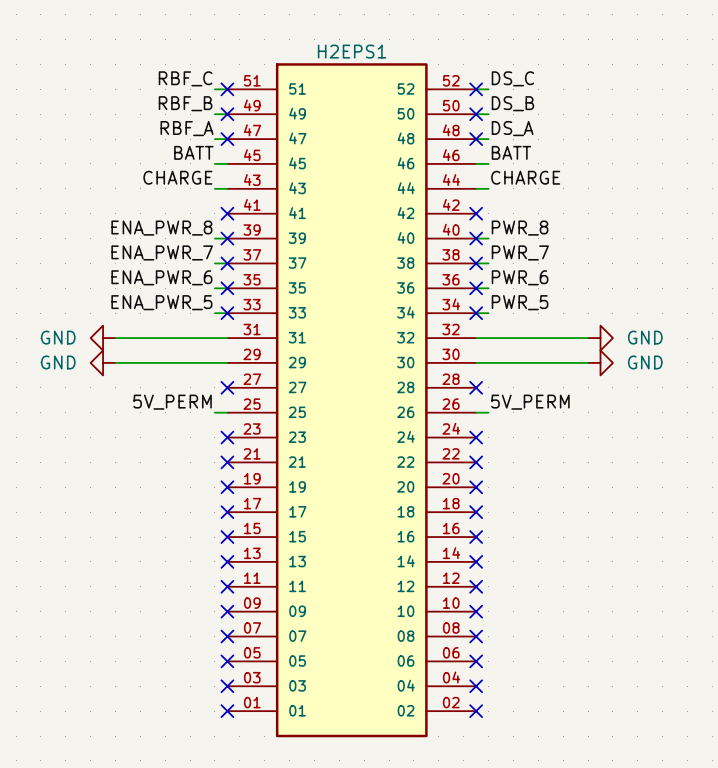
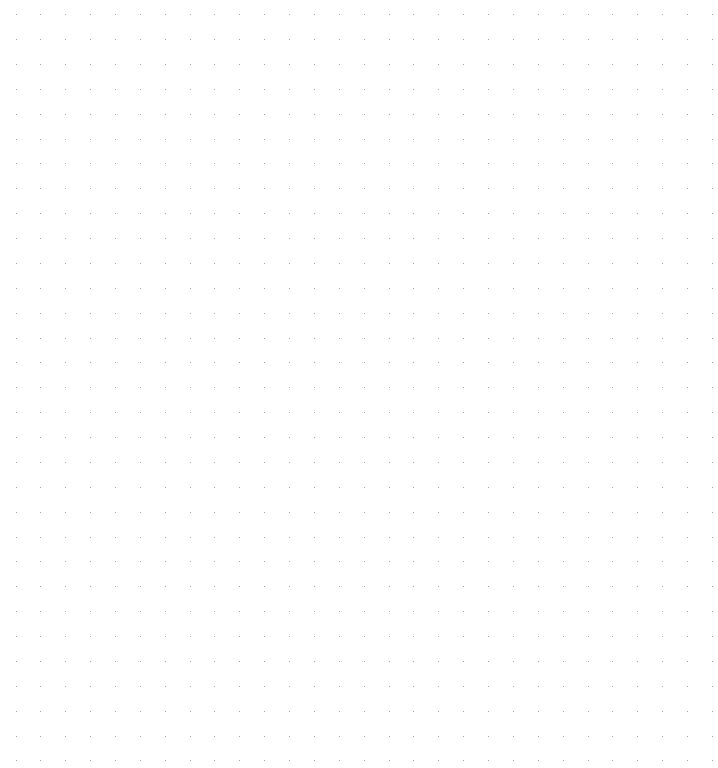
label: RBF_C (185, 78) -> none
label: DS_C (512, 78) -> none
wire: (214, 89) (227, 89) -> none
no-connect mark: (227, 89) -> none
wire: (476, 89) (488, 89) -> none
no-connect mark: (476, 89) -> none
label: RBF_B (185, 103) -> none
label: DS_B (512, 103) -> none
wire: (214, 114) (227, 114) -> none
no-connect mark: (227, 114) -> none
wire: (476, 114) (488, 114) -> none
no-connect mark: (476, 114) -> none
label: RBF_A (187, 128) -> none
label: DS_A (512, 128) -> none
wire: (214, 139) (227, 139) -> none
no-connect mark: (227, 139) -> none
wire: (476, 139) (488, 139) -> none
no-connect mark: (476, 139) -> none
label: BATT (193, 152) -> none
label: BATT (511, 152) -> none
wire: (214, 163) (227, 163) -> none
wire: (476, 163) (488, 163) -> none
label: CHARGE (177, 177) -> none
label: CHARGE (525, 177) -> none
wire: (214, 188) (227, 188) -> none
wire: (476, 188) (488, 188) -> none
no-connect mark: (227, 213) -> none
no-connect mark: (476, 213) -> none
label: ENA_PWR_8 (161, 228) -> none
label: PWR_8 (520, 228) -> none
wire: (214, 238) (227, 238) -> none
no-connect mark: (227, 238) -> none
wire: (476, 238) (488, 238) -> none
no-connect mark: (476, 238) -> none
label: ENA_PWR_7 (162, 252) -> none
label: PWR_7 (520, 252) -> none
wire: (214, 263) (227, 263) -> none
no-connect mark: (227, 263) -> none
wire: (476, 263) (488, 263) -> none
no-connect mark: (476, 263) -> none
label: ENA_PWR_6 (161, 277) -> none
label: PWR_6 (520, 277) -> none
wire: (214, 288) (227, 288) -> none
no-connect mark: (227, 288) -> none
wire: (476, 288) (488, 288) -> none
no-connect mark: (476, 288) -> none
label: ENA_PWR_5 (161, 302) -> none
label: PWR_5 (520, 302) -> none
wire: (214, 313) (227, 313) -> none
no-connect mark: (227, 313) -> none
wire: (476, 313) (488, 313) -> none
no-connect mark: (476, 313) -> none
power symbol: GND (103, 338) -> none
wire: (115, 338) (227, 338) -> none
wire: (476, 338) (588, 338) -> none
power symbol: GND (600, 338) -> none
power symbol: GND (103, 362) -> none
wire: (115, 362) (227, 362) -> none
wire: (476, 362) (588, 362) -> none
power symbol: GND (600, 362) -> none
no-connect mark: (227, 387) -> none
no-connect mark: (476, 387) -> none
H2EPS1: (351, 400) -> none
label: 5V_PERM (172, 402) -> none
label: 5V_PERM (530, 402) -> none
wire: (214, 412) (227, 412) -> none
wire: (476, 412) (488, 412) -> none
no-connect mark: (227, 437) -> none
no-connect mark: (476, 437) -> none
no-connect mark: (227, 462) -> none
no-connect mark: (476, 462) -> none
no-connect mark: (227, 487) -> none
no-connect mark: (476, 487) -> none
no-connect mark: (227, 512) -> none
no-connect mark: (476, 512) -> none
no-connect mark: (227, 537) -> none
no-connect mark: (476, 537) -> none
no-connect mark: (227, 561) -> none
no-connect mark: (476, 561) -> none
no-connect mark: (227, 586) -> none
no-connect mark: (476, 586) -> none
no-connect mark: (227, 611) -> none
no-connect mark: (476, 611) -> none
no-connect mark: (227, 636) -> none
no-connect mark: (476, 636) -> none
no-connect mark: (227, 661) -> none
no-connect mark: (476, 661) -> none
no-connect mark: (227, 686) -> none
no-connect mark: (476, 686) -> none
no-connect mark: (227, 711) -> none
no-connect mark: (476, 711) -> none

